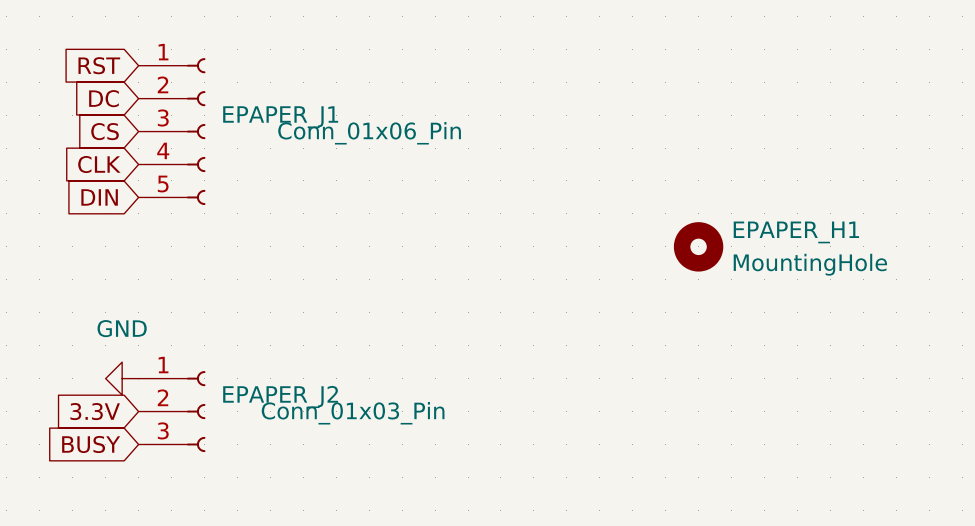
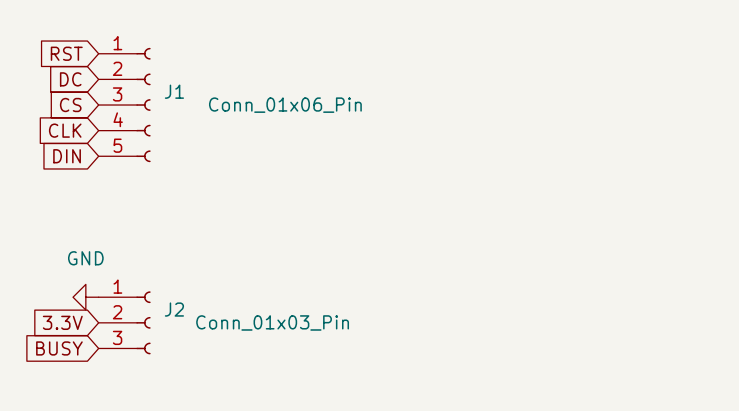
EPAPER_J1 name: EPAPER_J1 (280, 117) -> J1 (174, 91)
EPAPER_H1: MountingHole (698, 246) -> none
EPAPER_J2 name: EPAPER_J2 (280, 396) -> J2 (174, 309)

